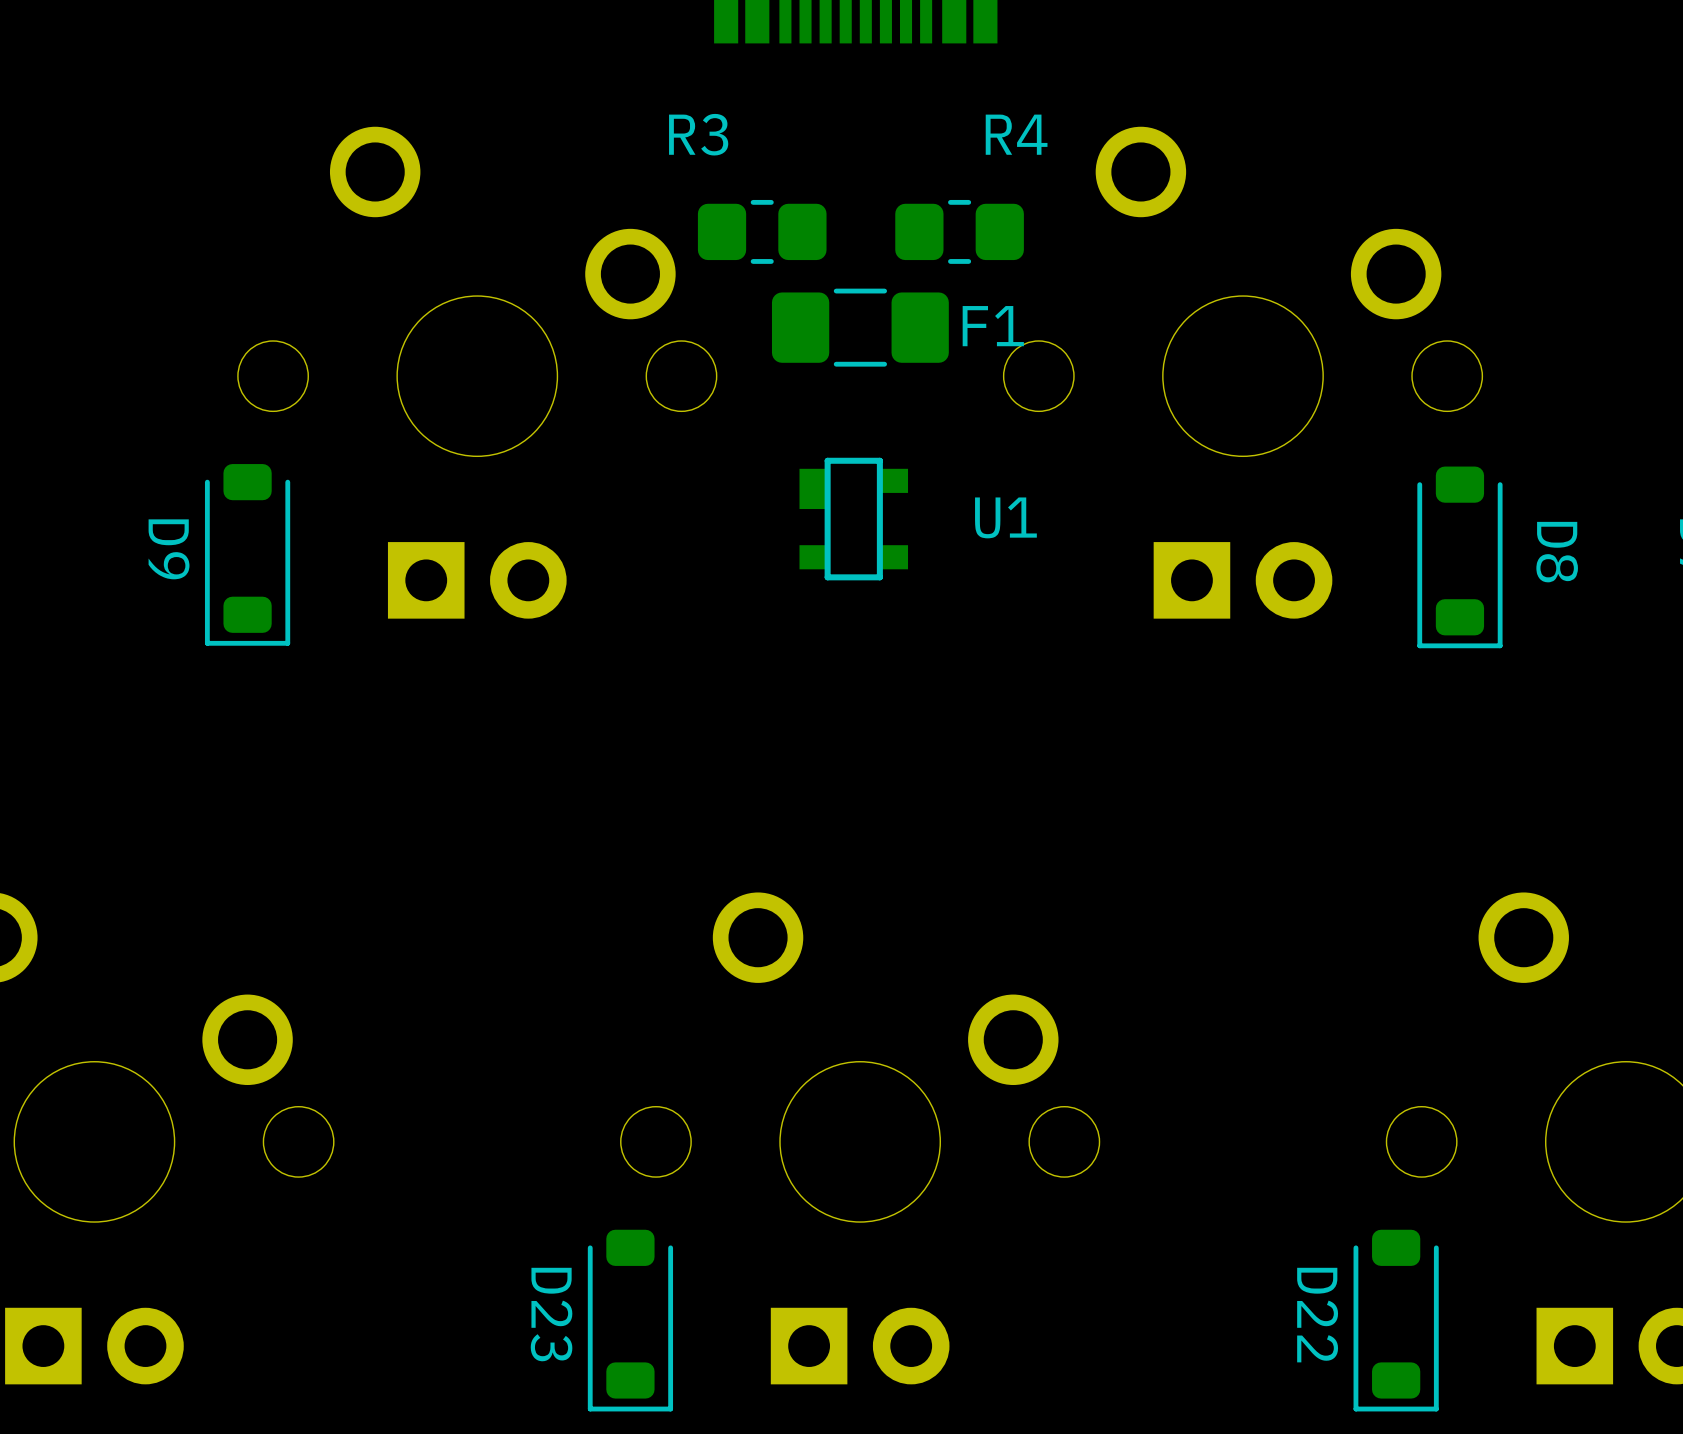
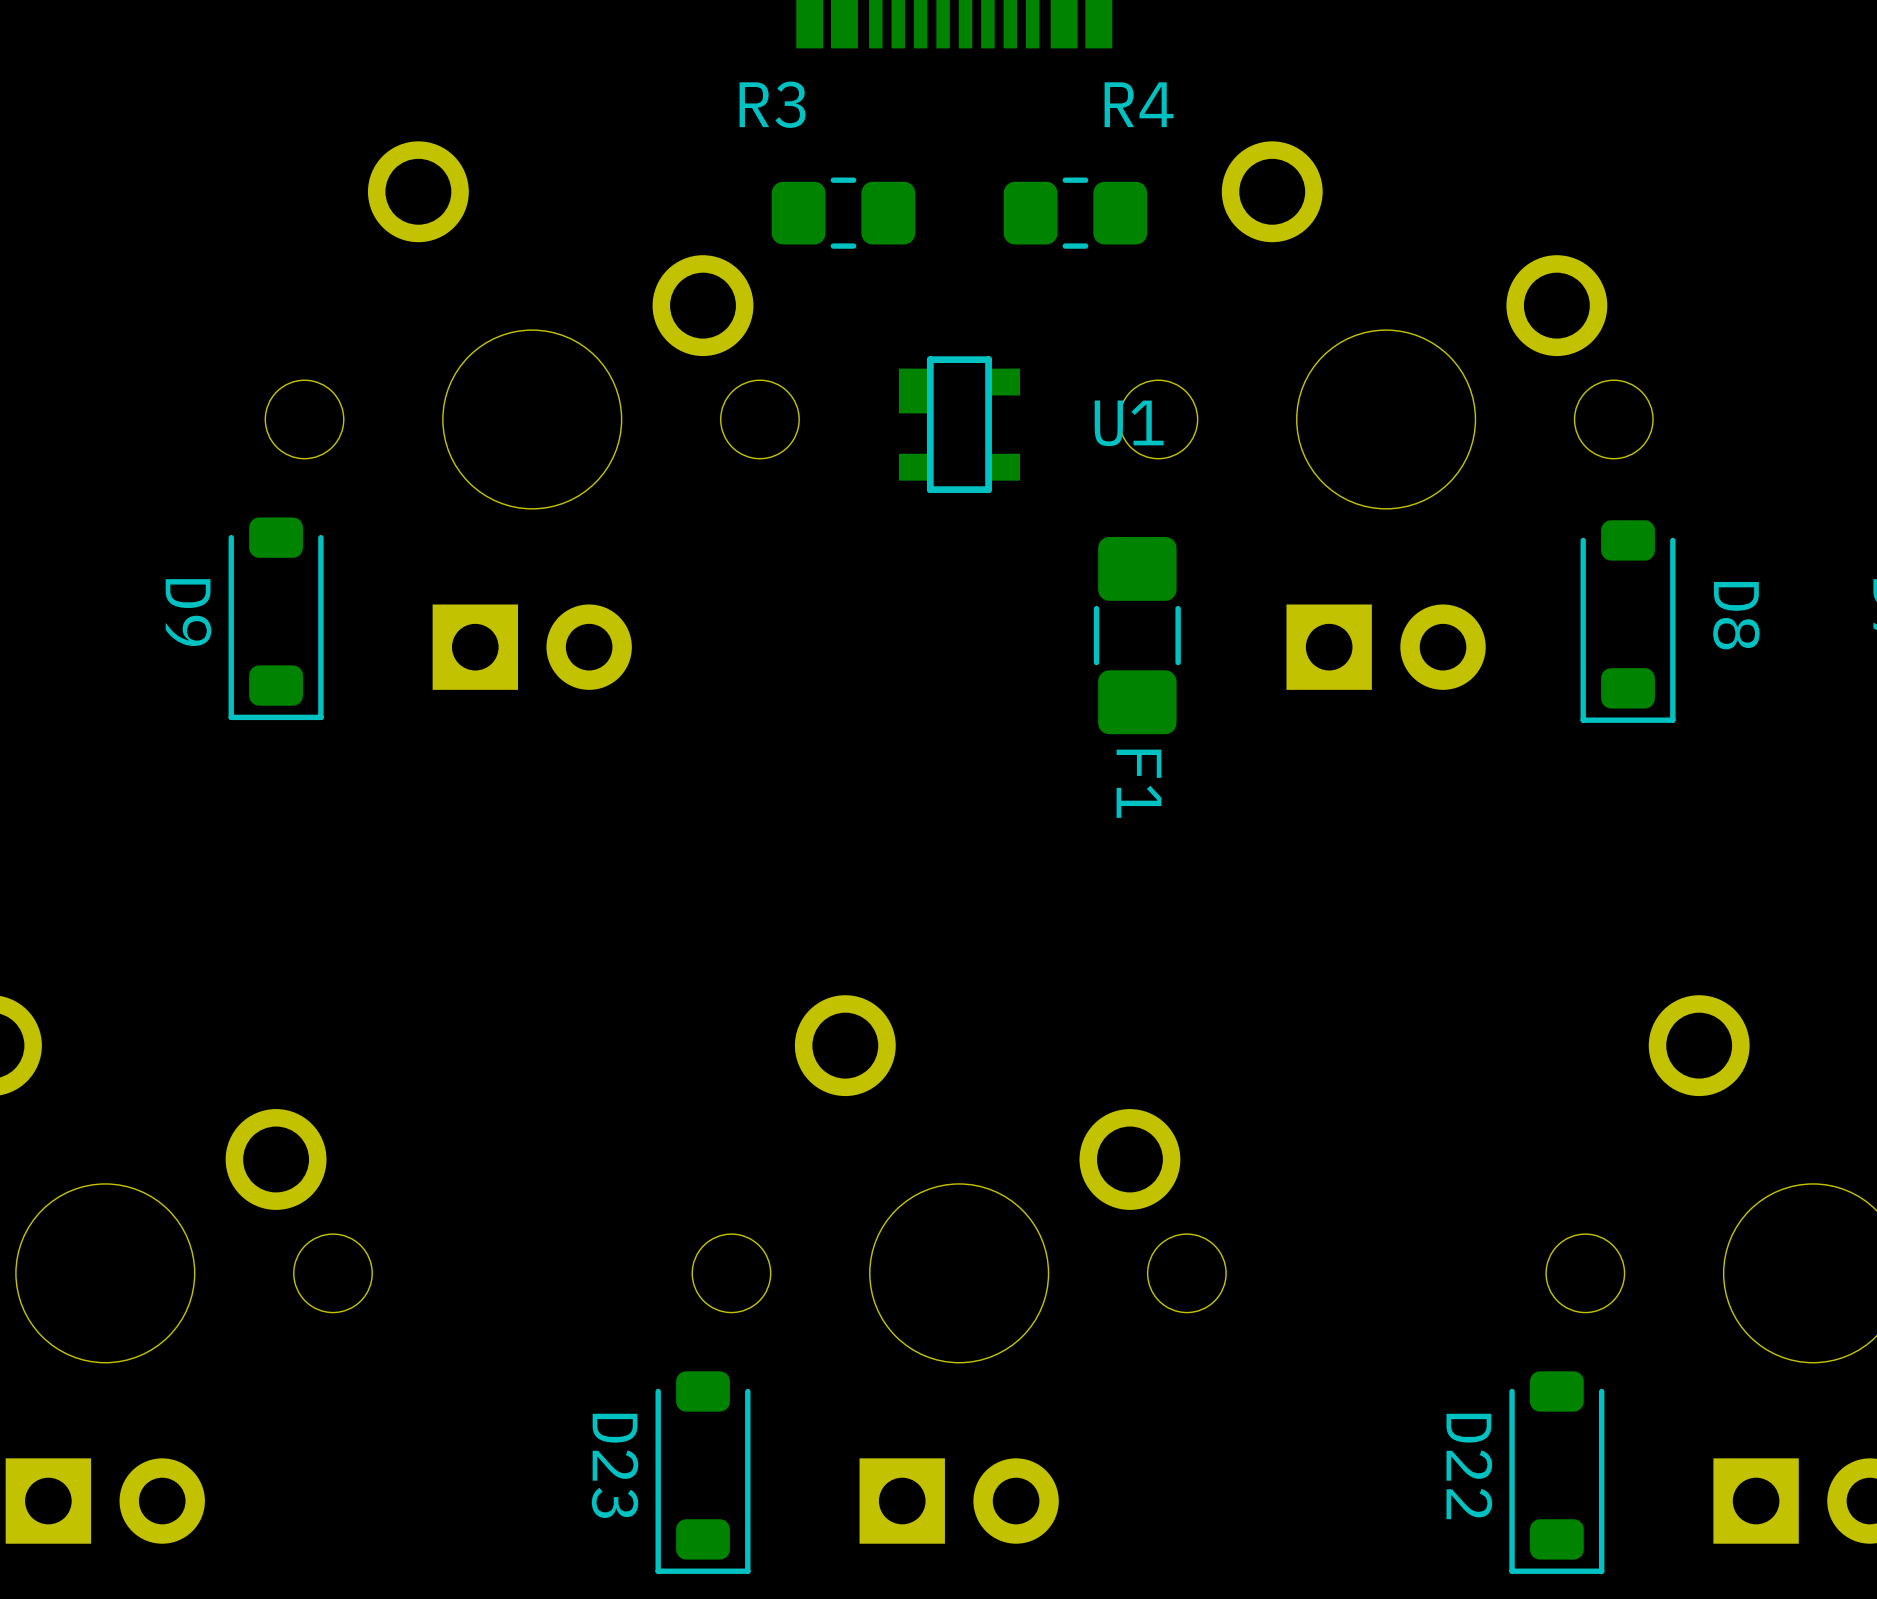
R3 position: (762, 231) -> (843, 213)
R4 position: (959, 231) -> (1075, 213)
F1 rotation: 0° (860, 327) -> 90° clockwise (1137, 635)
F1 position: (860, 327) -> (1137, 635)
U1 position: (853, 519) -> (959, 424)

